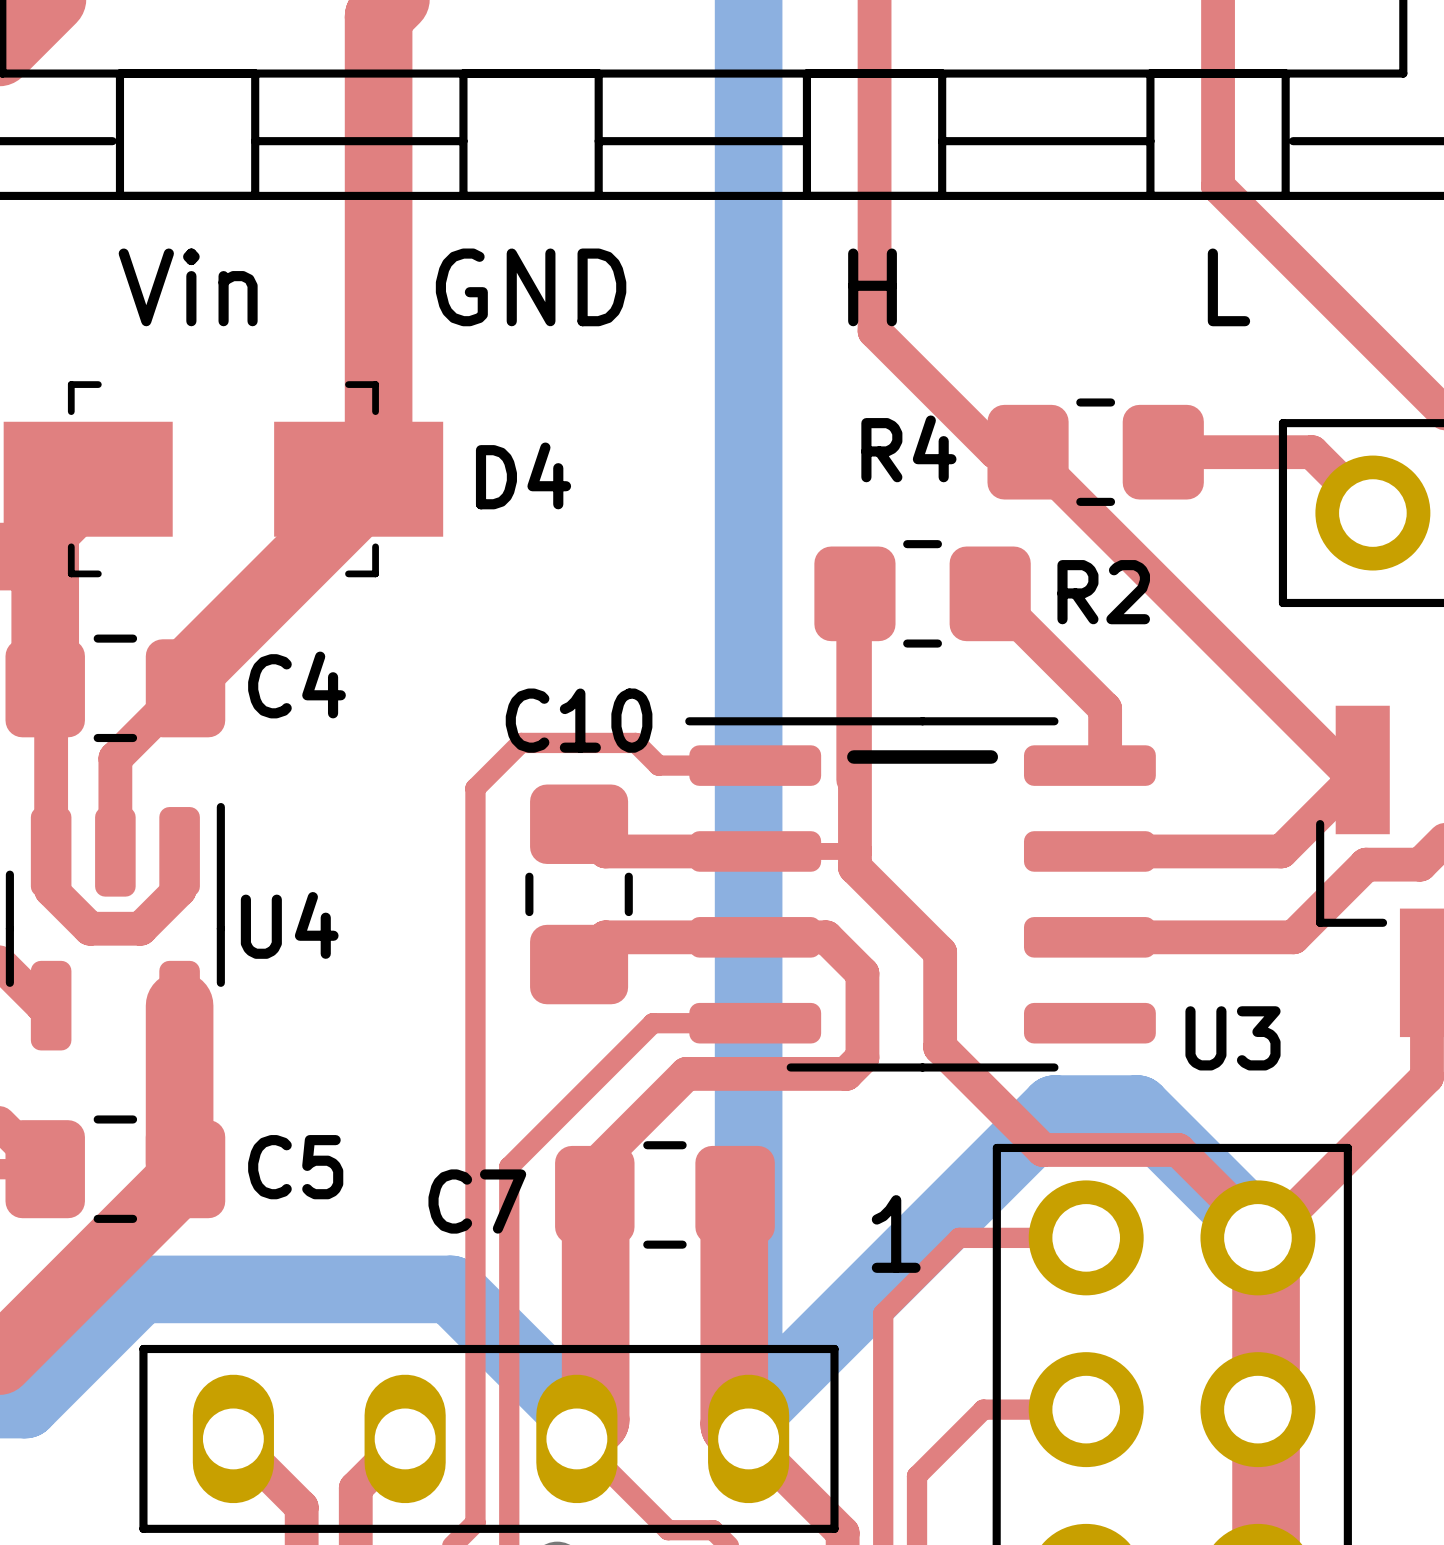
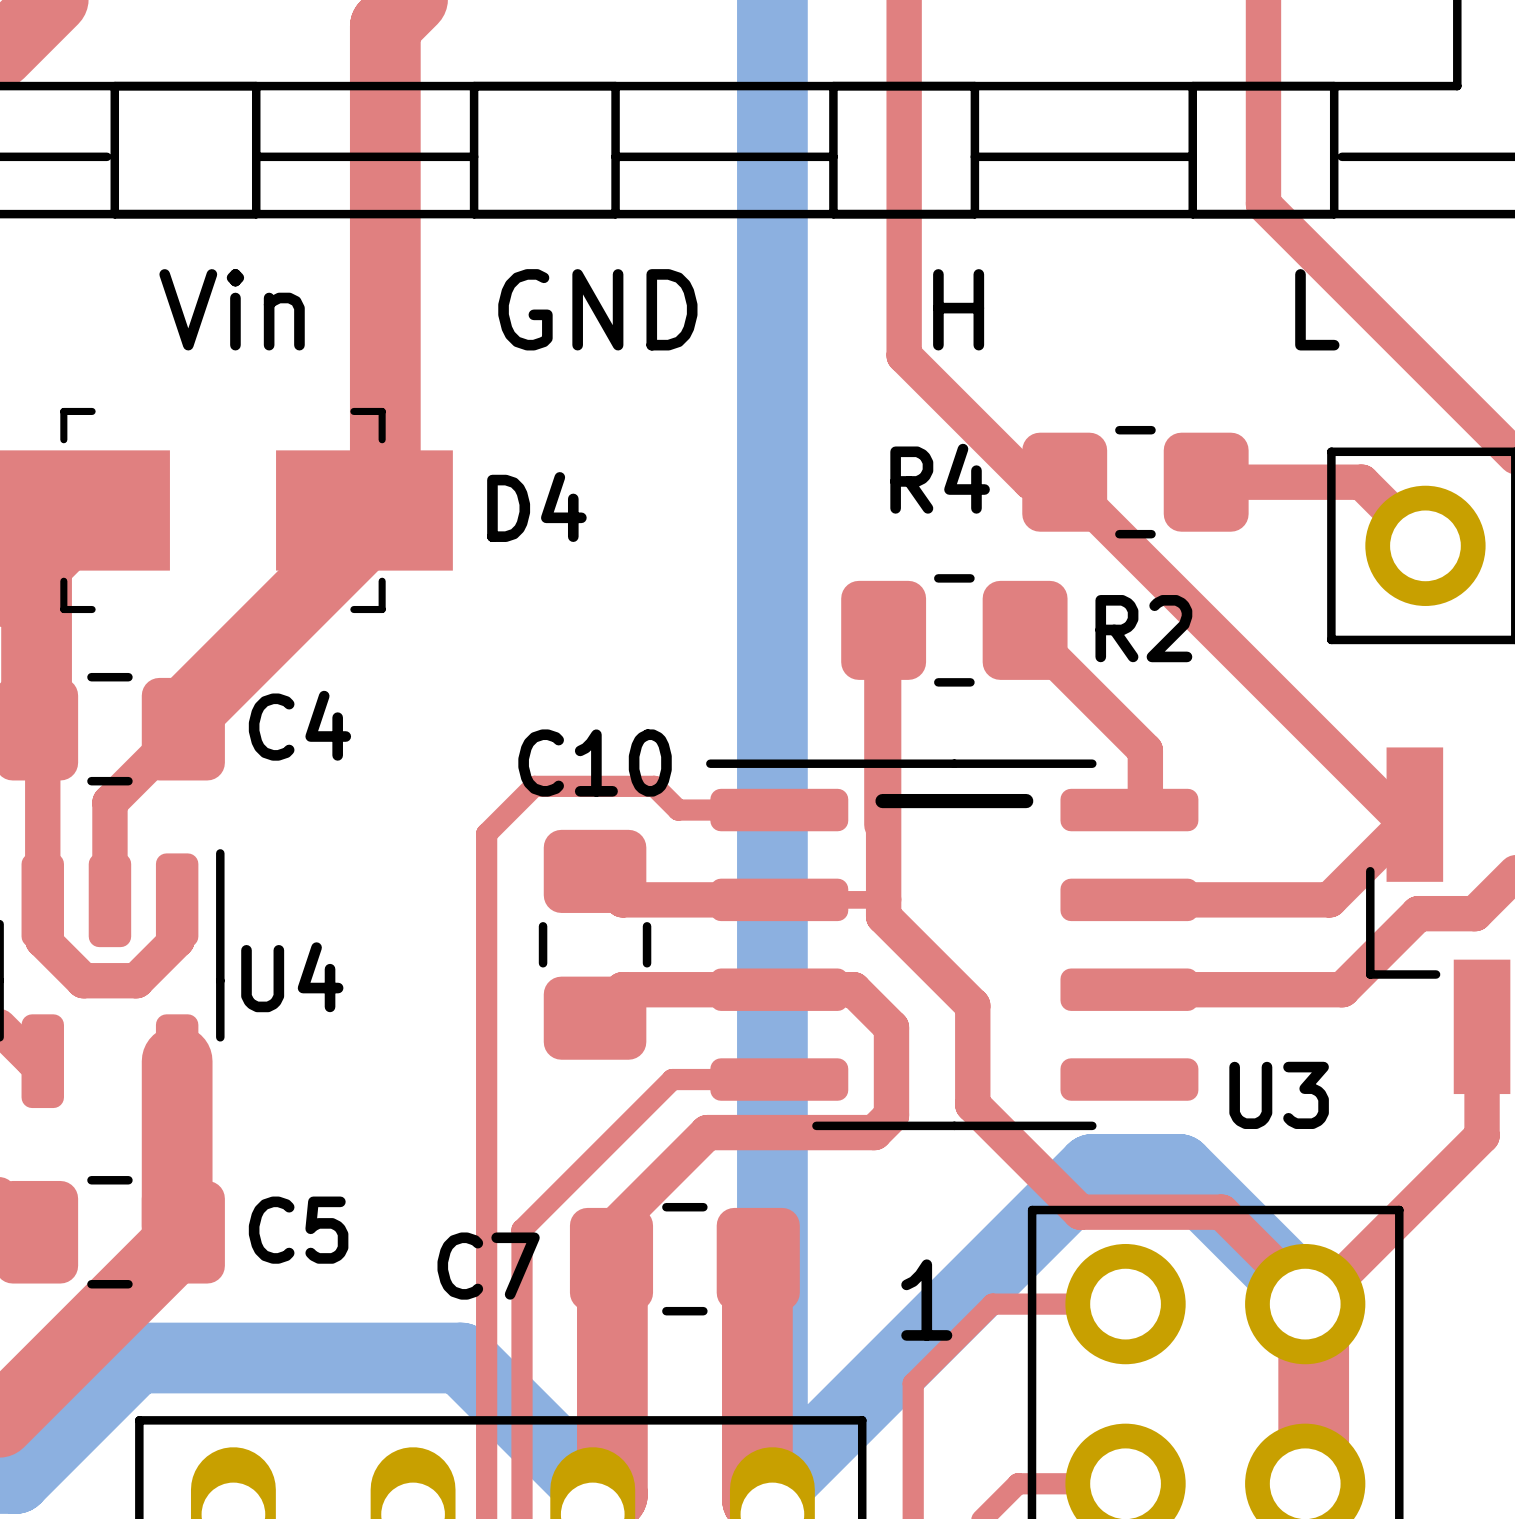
text position: Vin (188, 287) -> Vin (232, 309)
text position: GND (531, 287) -> GND (597, 309)
text position: H (872, 287) -> H (958, 309)
text position: L (1228, 287) -> L (1317, 309)

